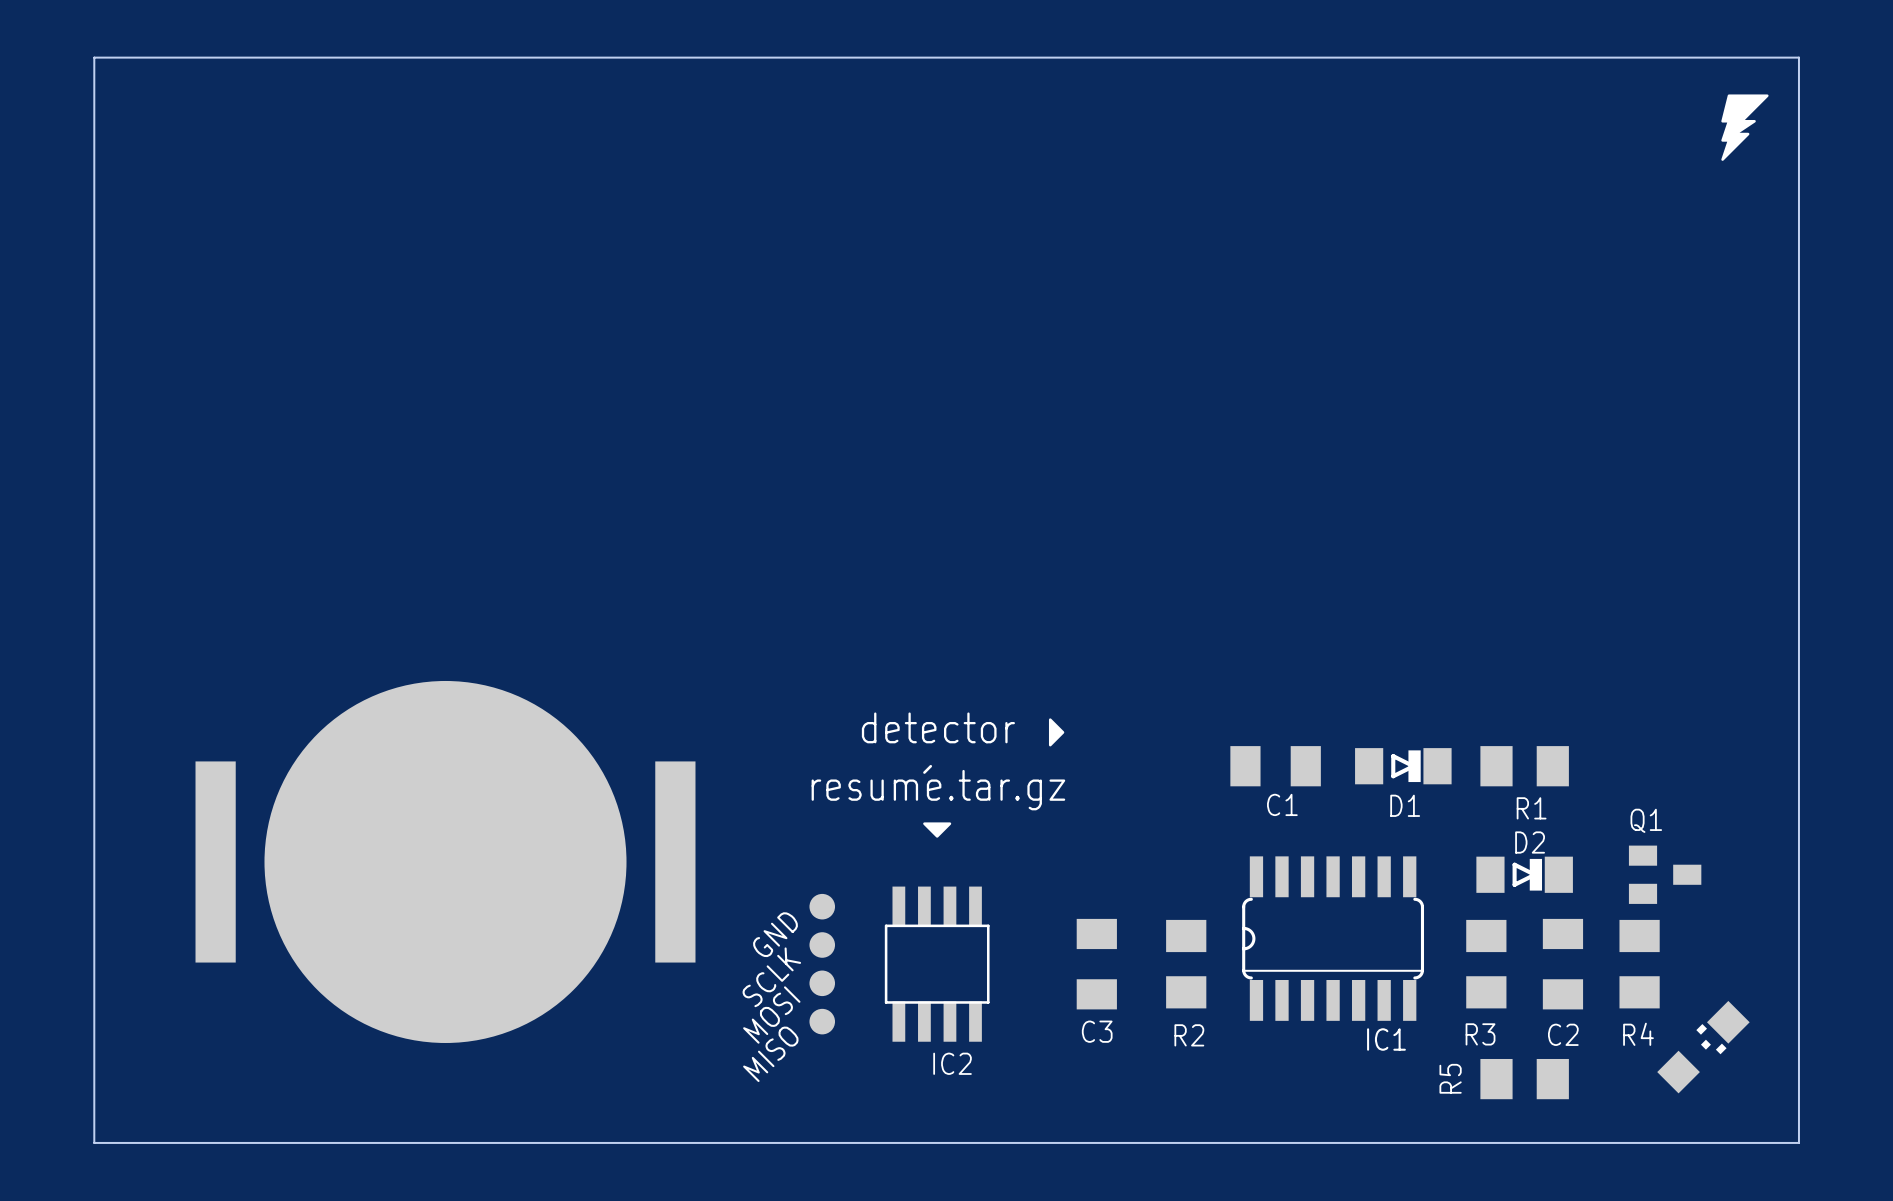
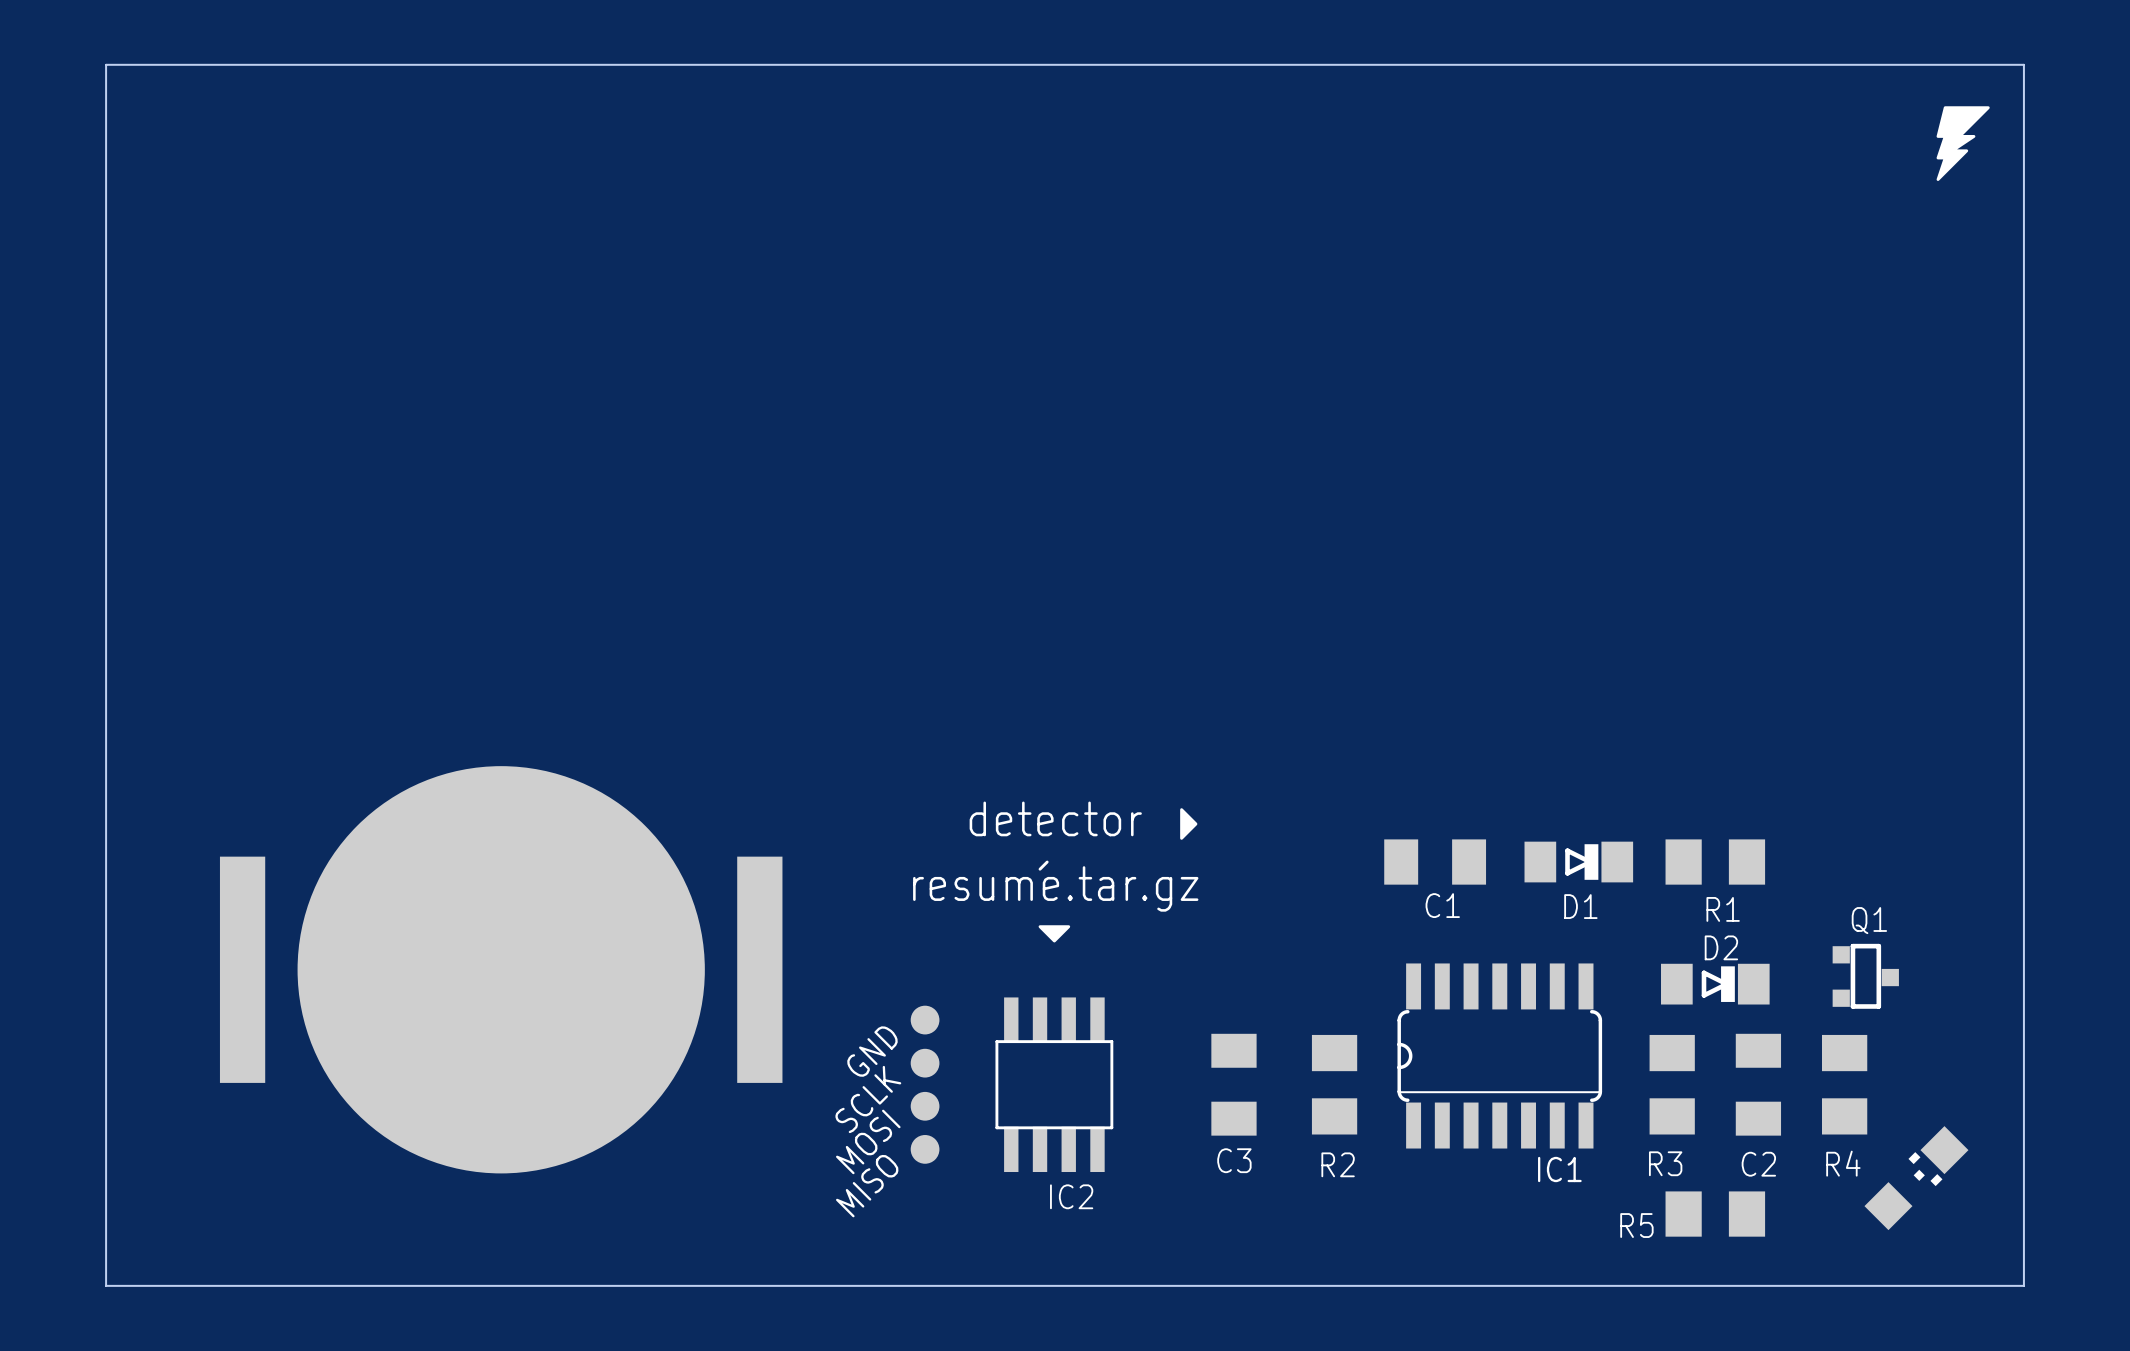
Q1 footprint: [1628, 845, 1702, 904] -> [1832, 943, 1899, 1009]
R5 name rotation: 0° (1450, 1078) -> 90° clockwise (1636, 1225)

